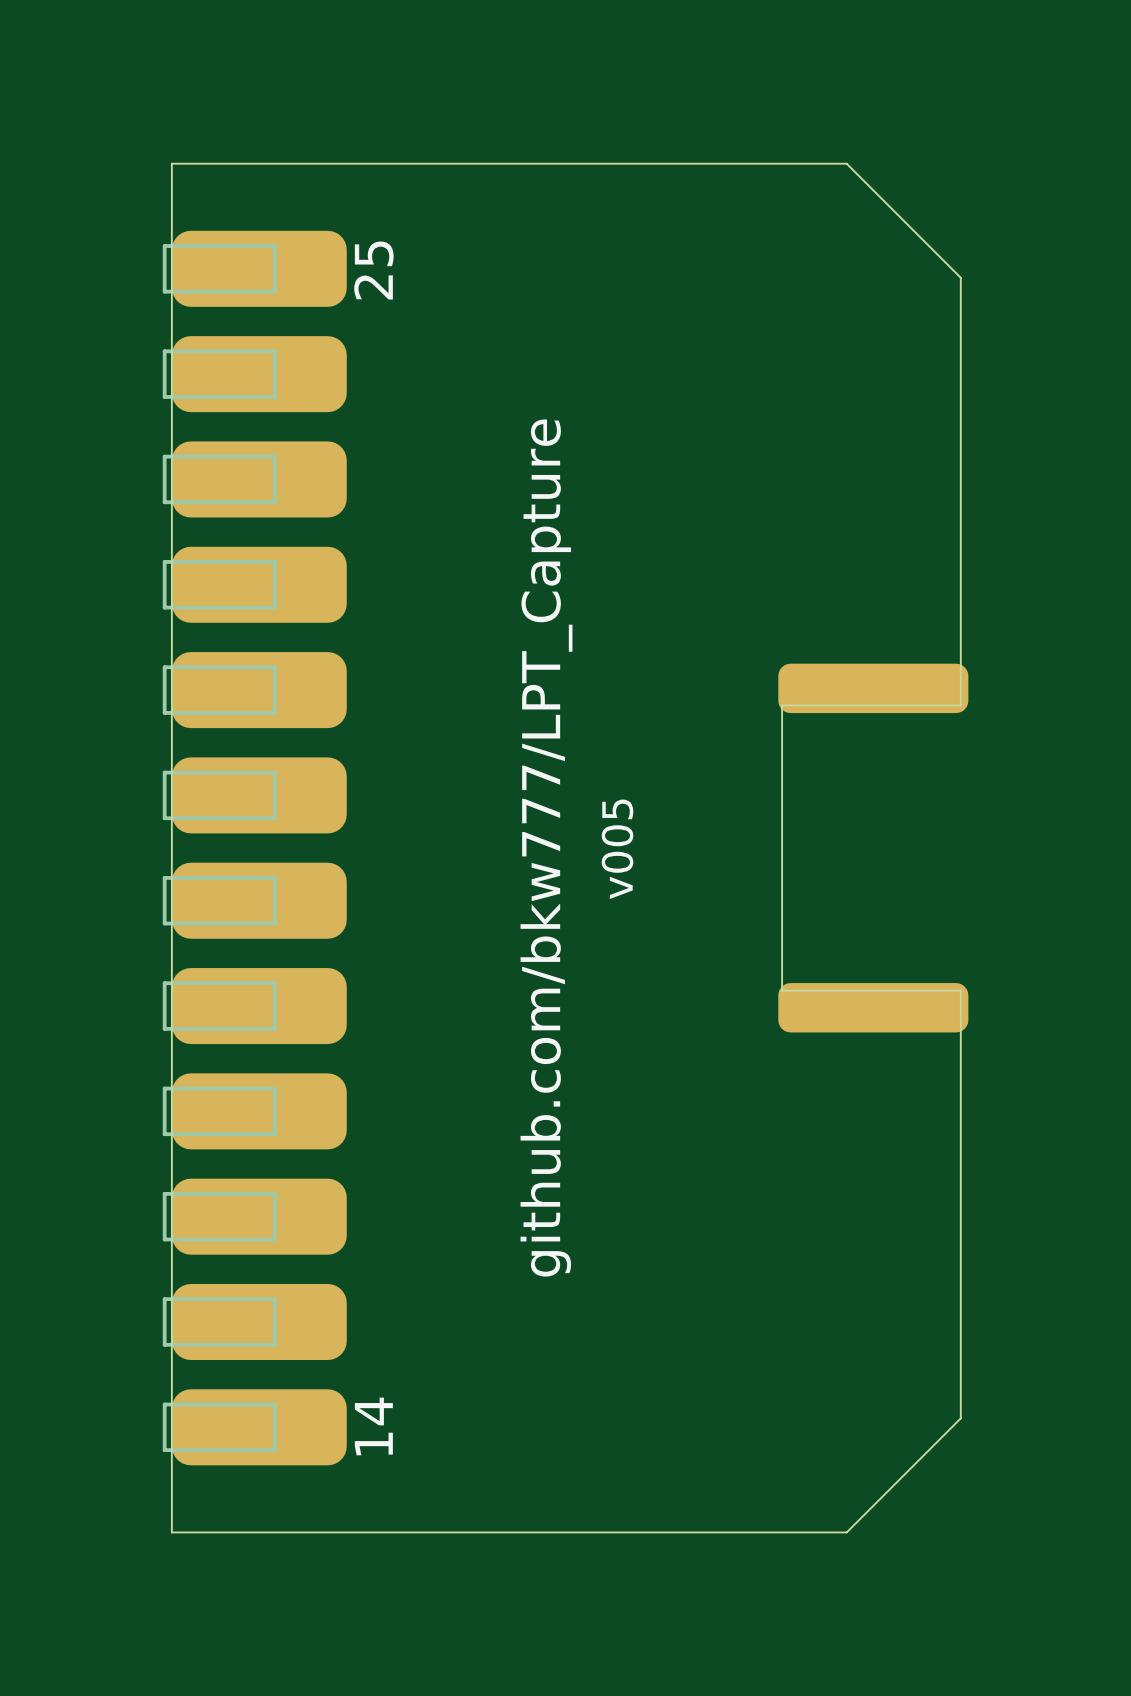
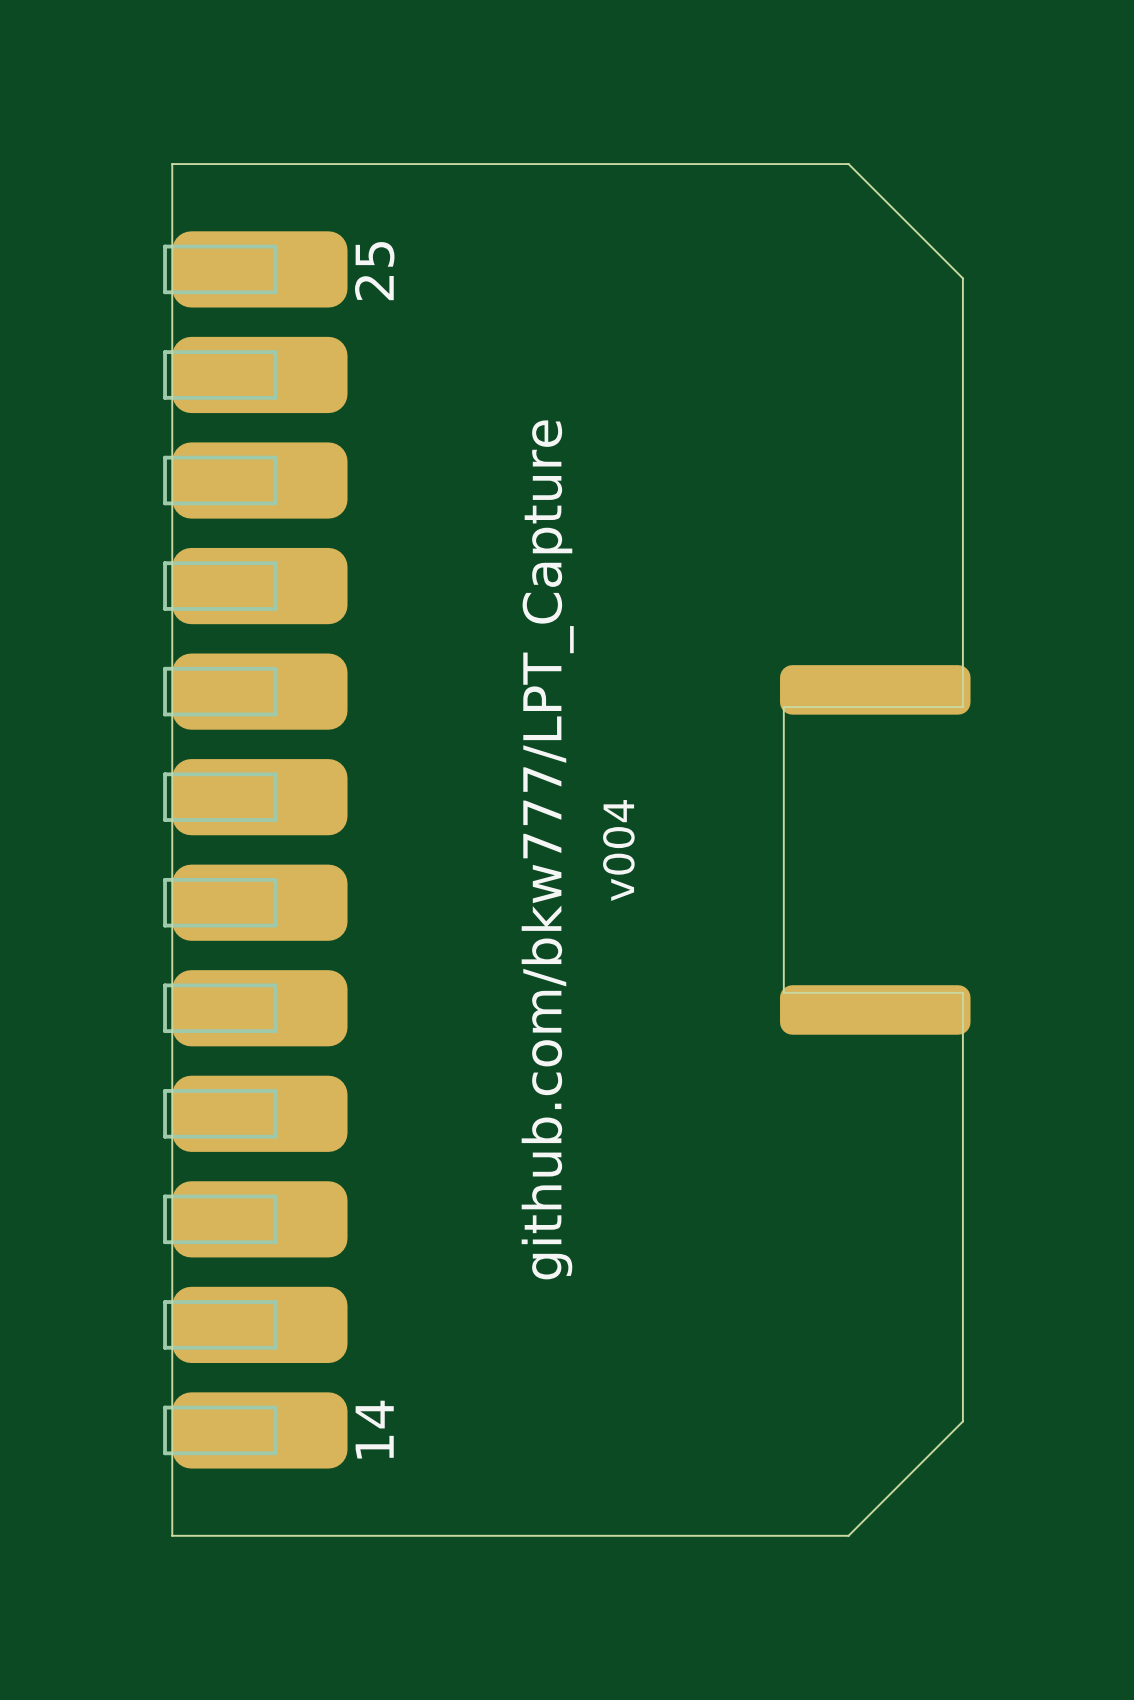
text: v005 (617, 849) -> v004 (618, 850)

